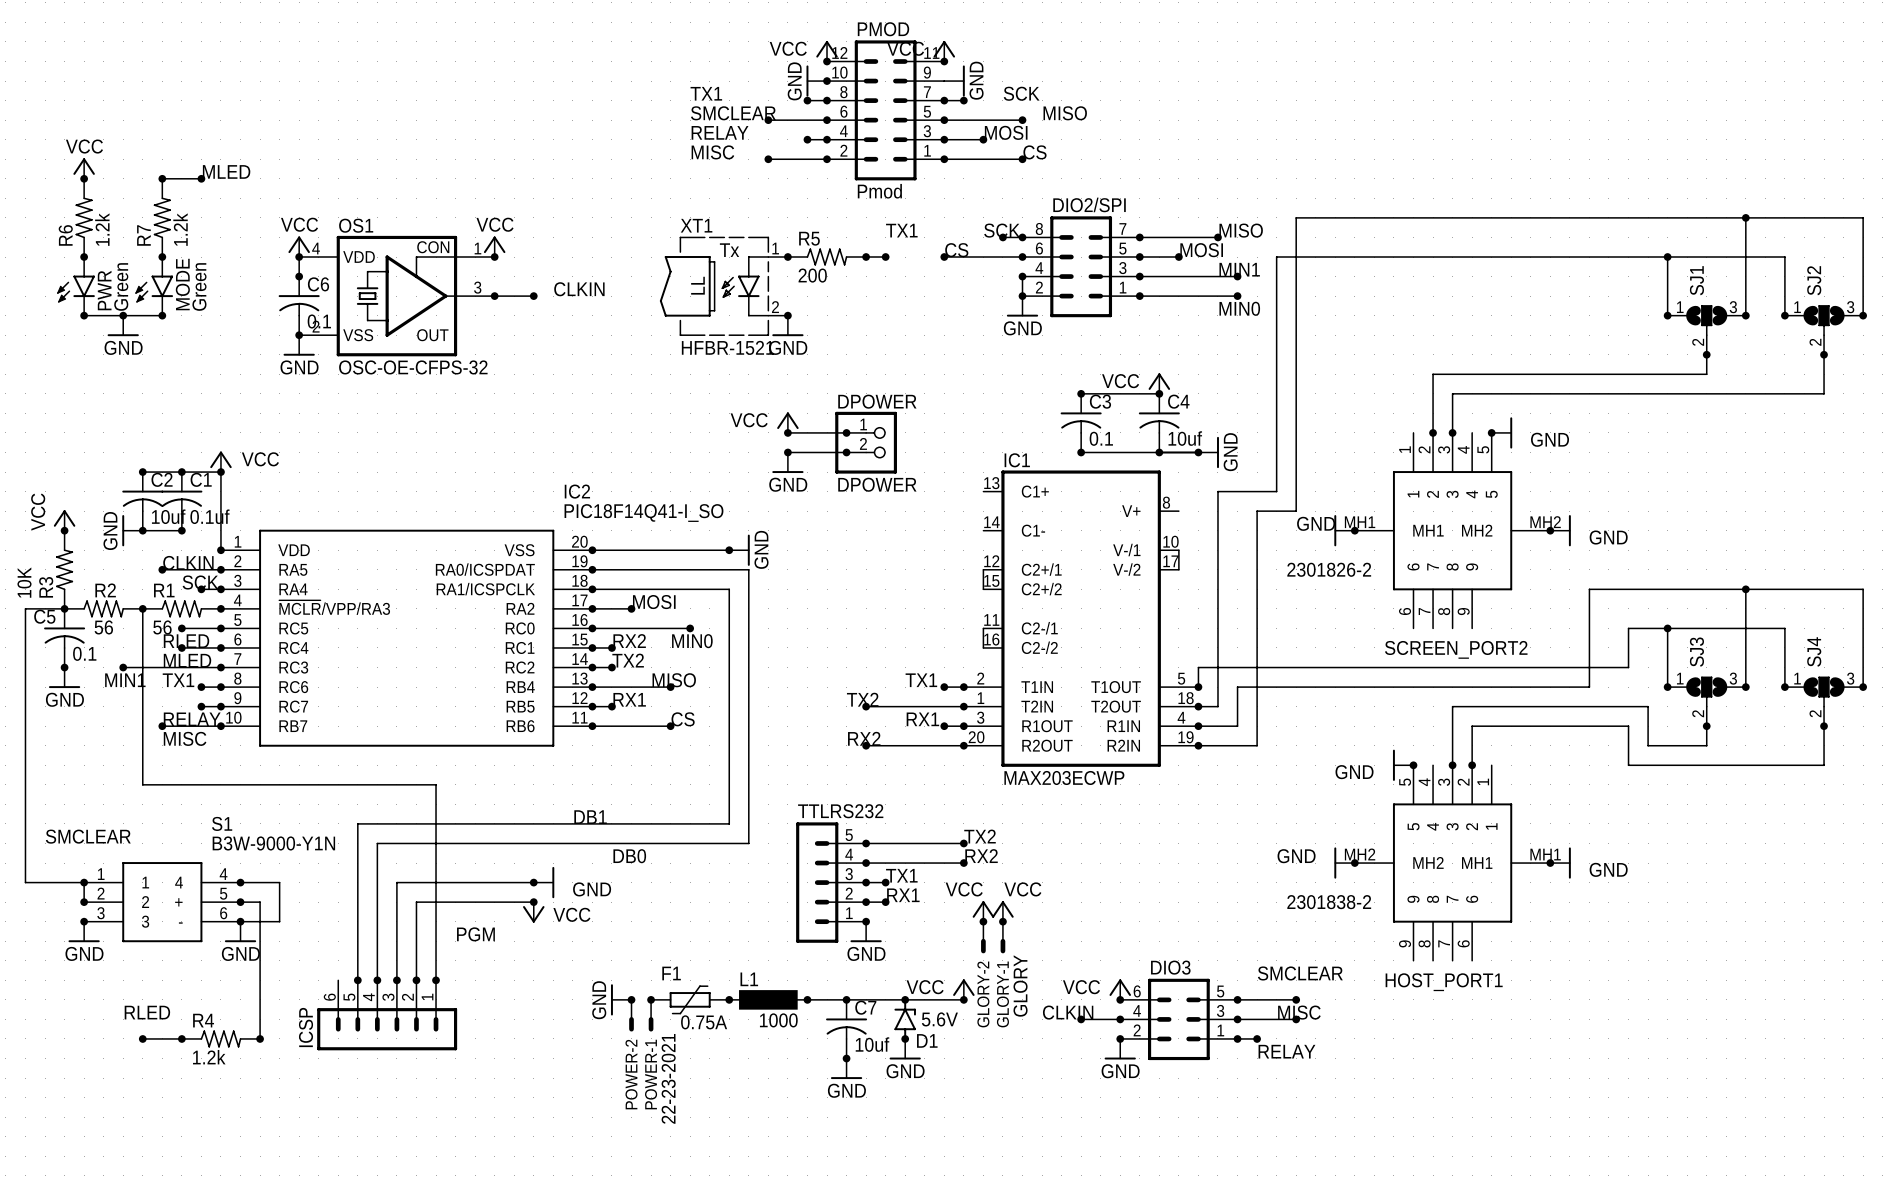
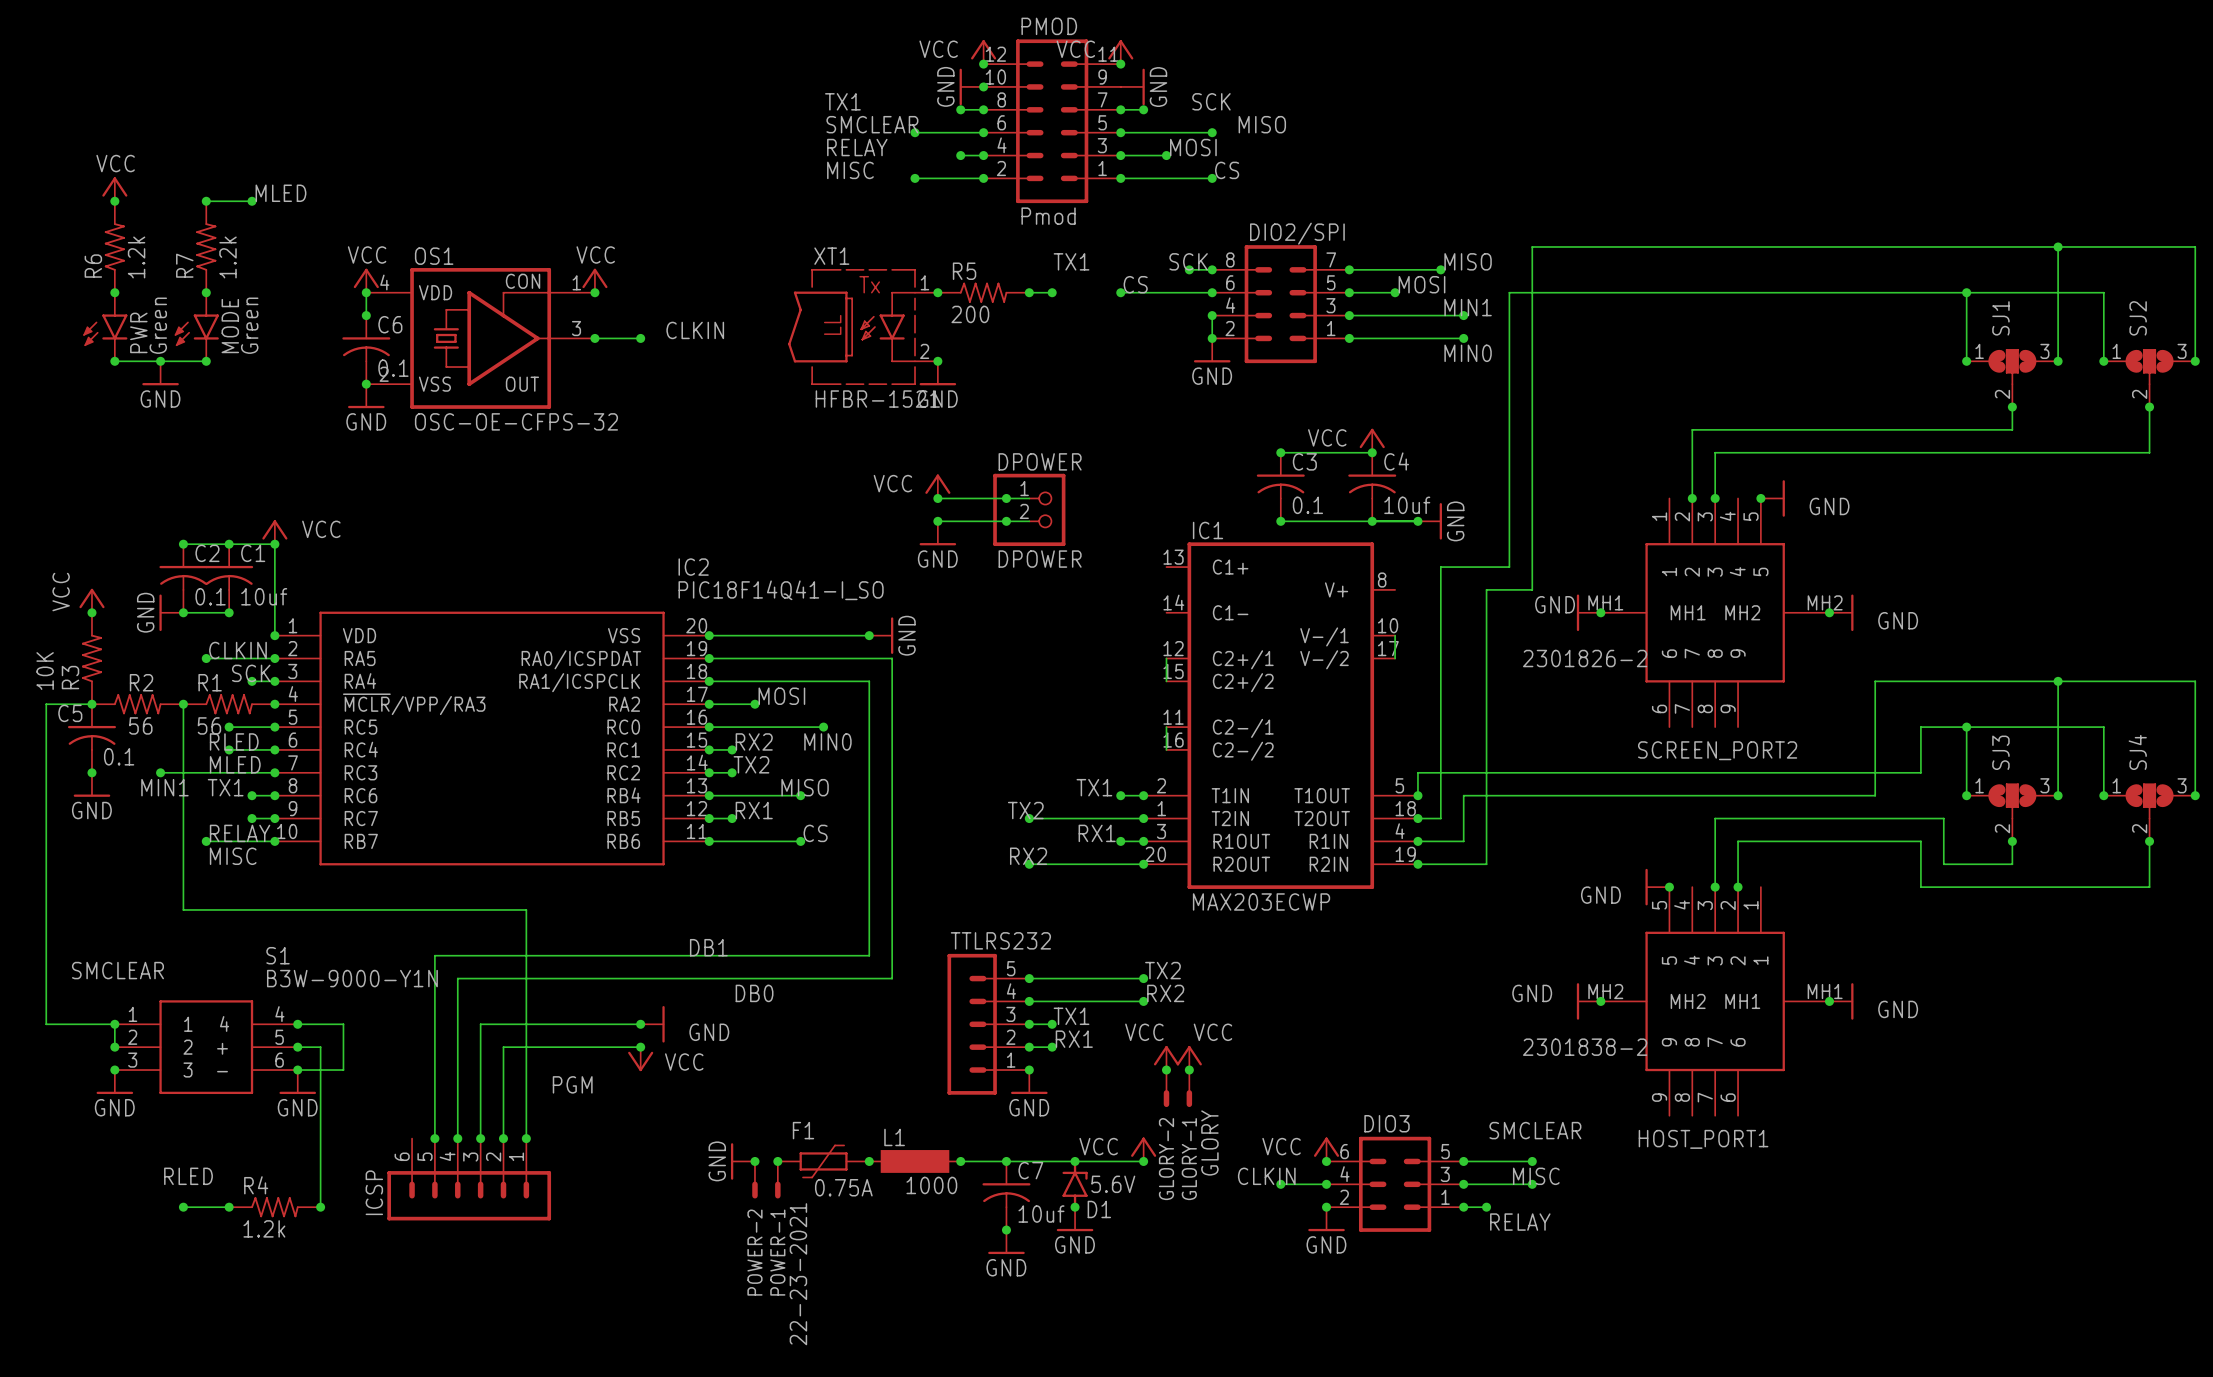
C2 value: 10uf (168, 516) -> 0.1 (210, 596)
C1 value: 0.1uf (209, 516) -> 10uf (264, 596)

